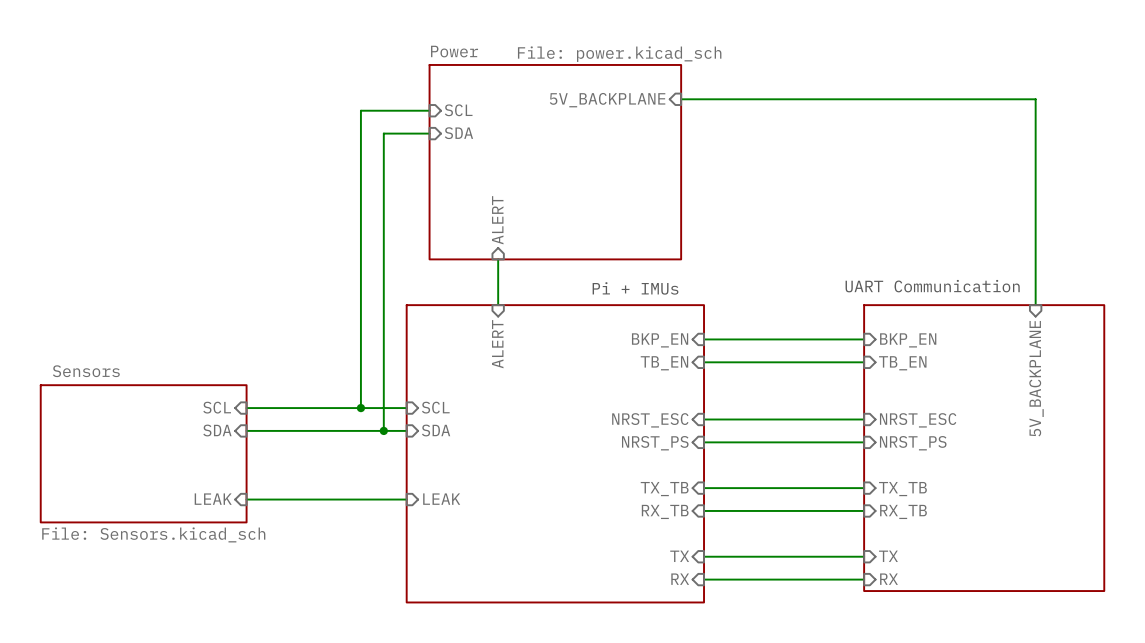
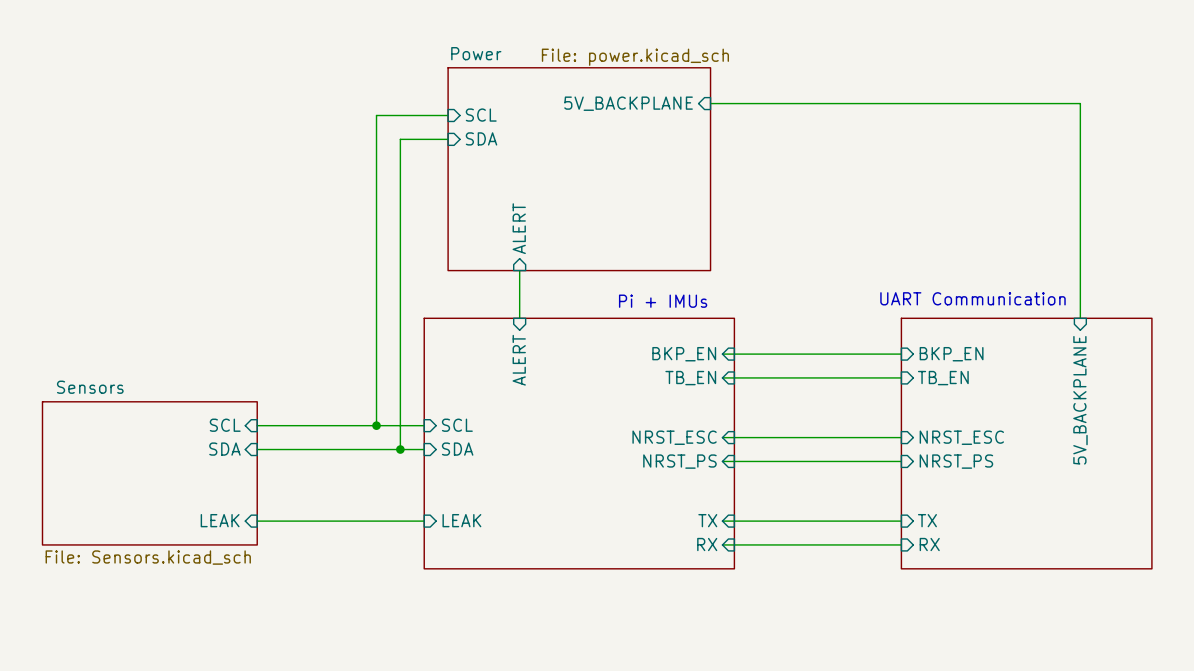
wire: none -> (722, 354) (734, 354)
wire: none -> (722, 377) (734, 377)
wire: none -> (722, 437) (734, 437)
sheet: none -> (579, 443)
sheet: none -> (1026, 443)
wire: none -> (722, 461) (734, 461)
sheet: (984, 448) -> none
sheet: (555, 453) -> none
wire: (704, 488) (864, 488) -> none
sheet pin: TX_TB (664, 489) -> none
sheet pin: TX_TB (902, 489) -> none
wire: none -> (722, 521) (901, 521)
wire: (704, 510) (864, 510) -> none
sheet pin: RX_TB (665, 511) -> none
sheet pin: RX_TB (903, 511) -> none
wire: none -> (722, 544) (901, 544)
sheet pin position: TX (679, 556) -> TX (707, 520)
wire: (704, 556) (864, 556) -> none
sheet pin position: TX (888, 556) -> TX (927, 520)
sheet pin position: RX (680, 579) -> RX (707, 544)
wire: (704, 579) (864, 579) -> none
sheet pin position: RX (889, 579) -> RX (929, 544)

